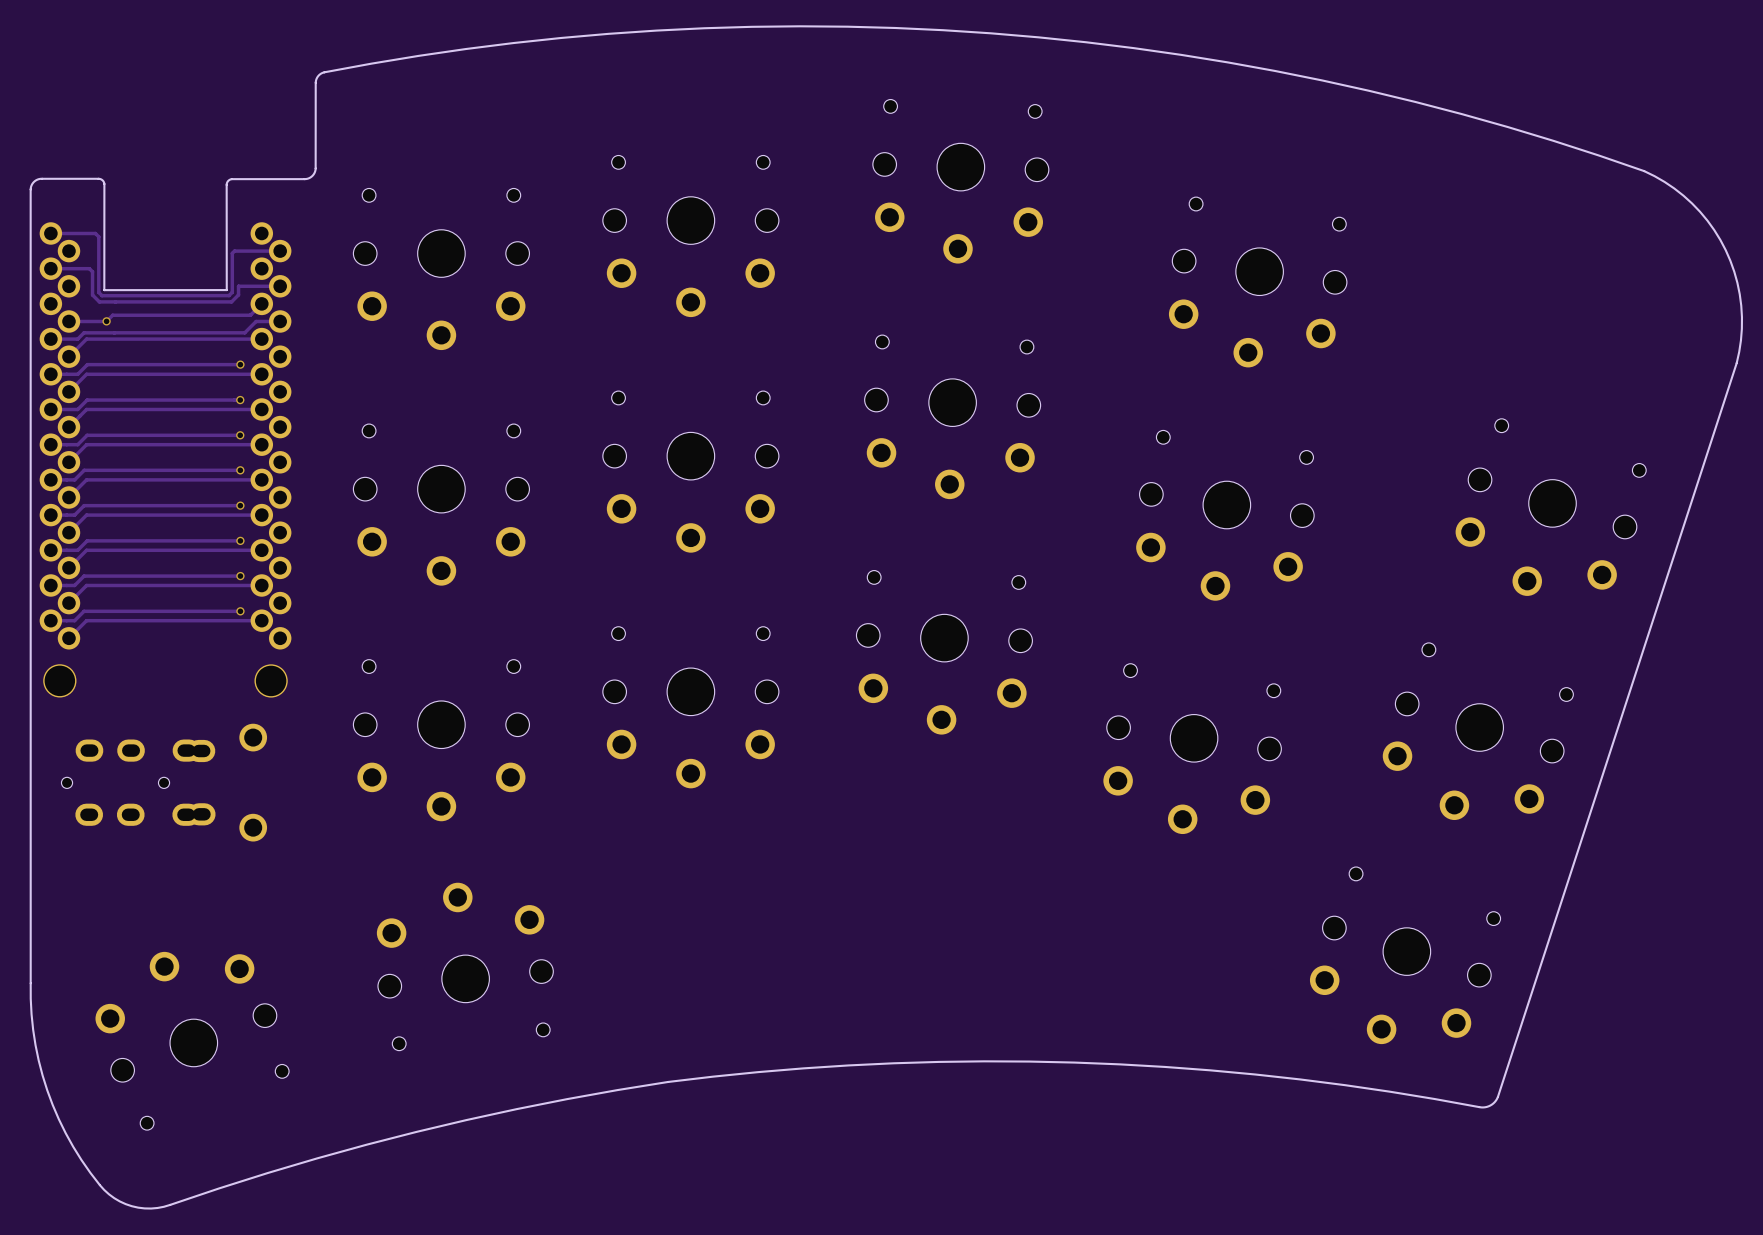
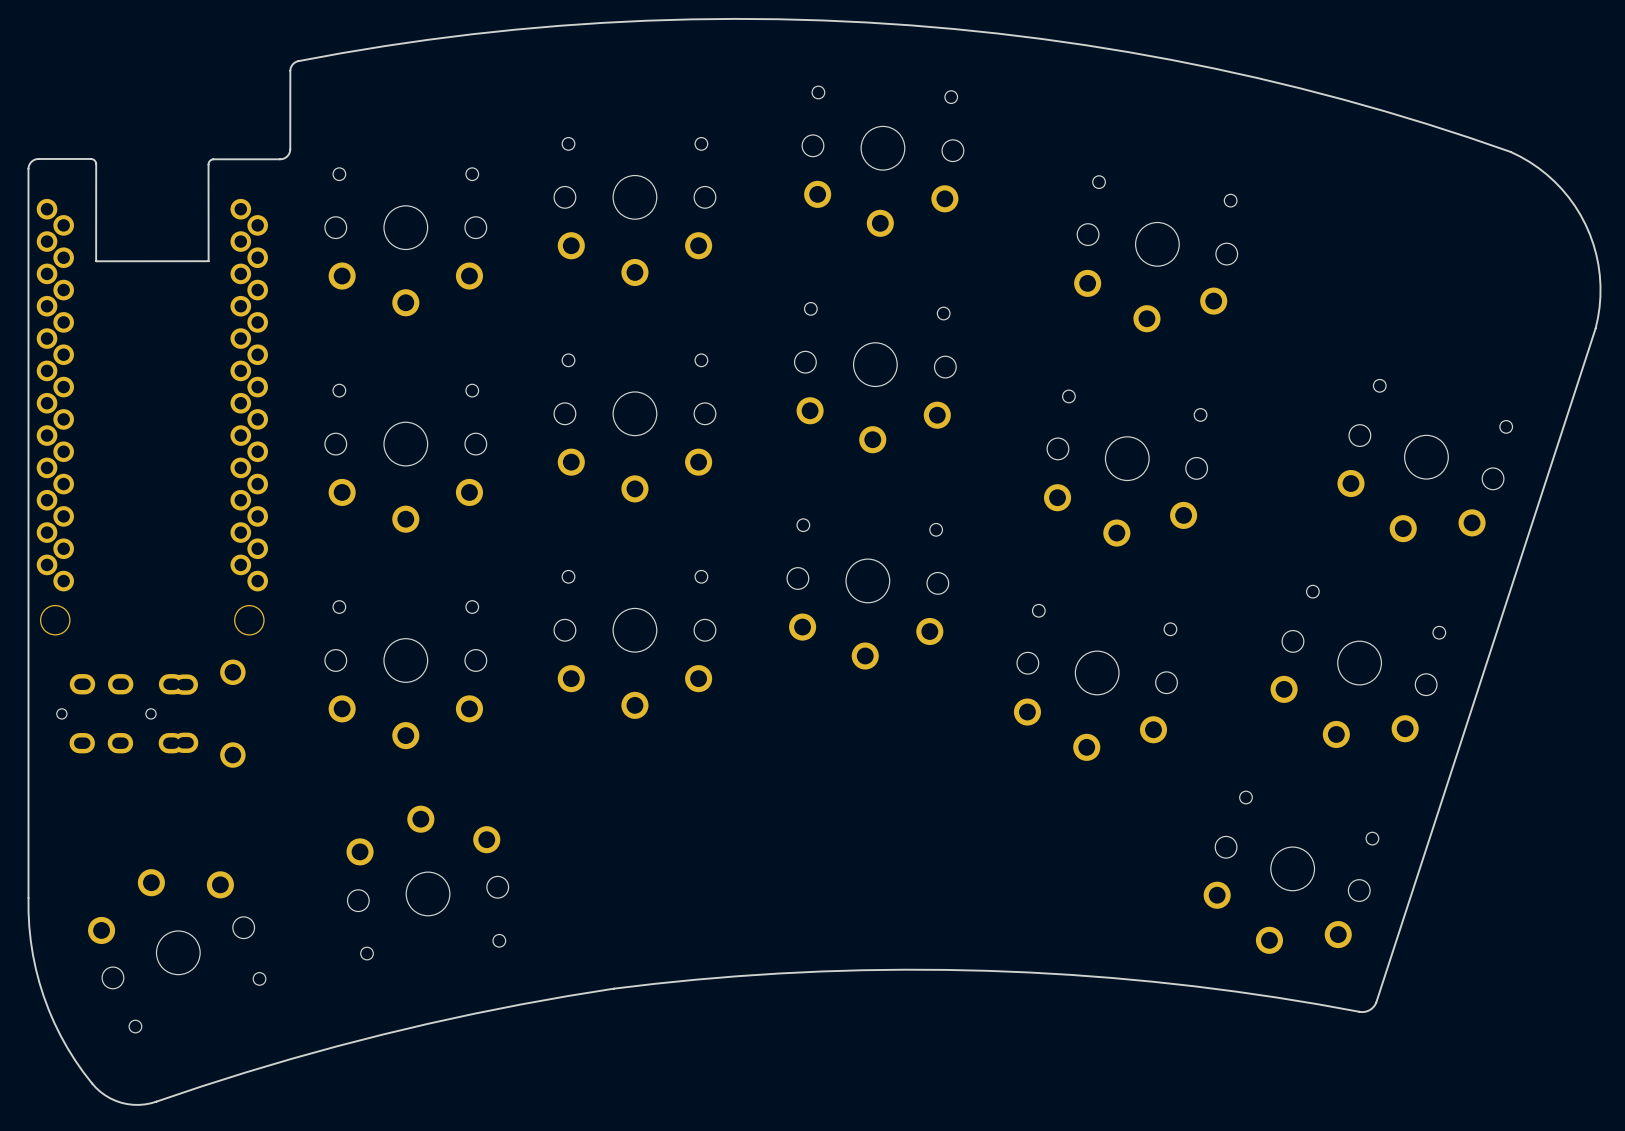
track: (50, 233) (95, 233) (98, 236) (98, 292) (102, 295) (229, 295) (232, 292) (232, 253) (234, 251) (280, 251) -> none
track: (50, 268) (89, 268) (92, 271) (92, 295) (99, 301) (231, 301) (238, 294) (238, 286) (280, 286) -> none
track: (261, 303) (250, 315) (112, 315) (106, 321) (68, 321) -> none
via: (106, 321) -> none
track: (280, 321) (256, 321) (244, 332) (114, 332) -> none
track: (114, 332) (84, 332) (77, 339) (50, 339) -> none
track: (261, 339) (86, 339) (68, 356) -> none
track: (240, 364) (87, 364) (77, 374) (50, 374) -> none
via: (240, 364) -> none
track: (261, 374) (86, 374) (68, 391) -> none
track: (240, 400) (87, 400) (77, 409) (50, 409) -> none
via: (240, 400) -> none
track: (261, 409) (86, 409) (68, 427) -> none
track: (240, 435) (87, 435) (77, 444) (50, 444) -> none
via: (240, 435) -> none
track: (261, 444) (86, 444) (68, 462) -> none
track: (240, 470) (84, 470) (74, 479) (50, 479) -> none
via: (240, 470) -> none
track: (261, 479) (86, 479) (68, 497) -> none
track: (240, 505) (84, 505) (74, 515) (50, 515) -> none
via: (240, 505) -> none
track: (261, 515) (86, 515) (68, 532) -> none
track: (240, 540) (87, 540) (77, 550) (50, 550) -> none
via: (240, 540) -> none
track: (261, 550) (86, 550) (68, 567) -> none
track: (240, 576) (84, 576) (74, 585) (50, 585) -> none
via: (240, 576) -> none
track: (261, 585) (86, 585) (68, 603) -> none
track: (240, 611) (84, 611) (74, 620) (50, 620) -> none
via: (240, 611) -> none
track: (261, 620) (86, 620) (68, 638) -> none

